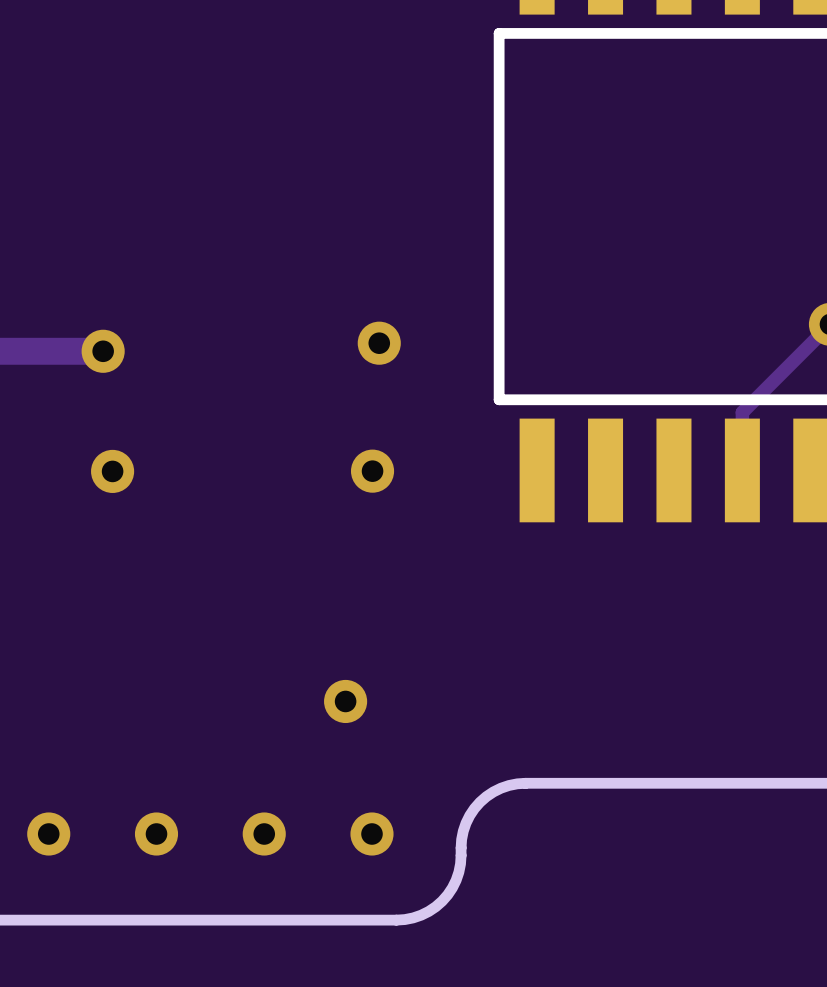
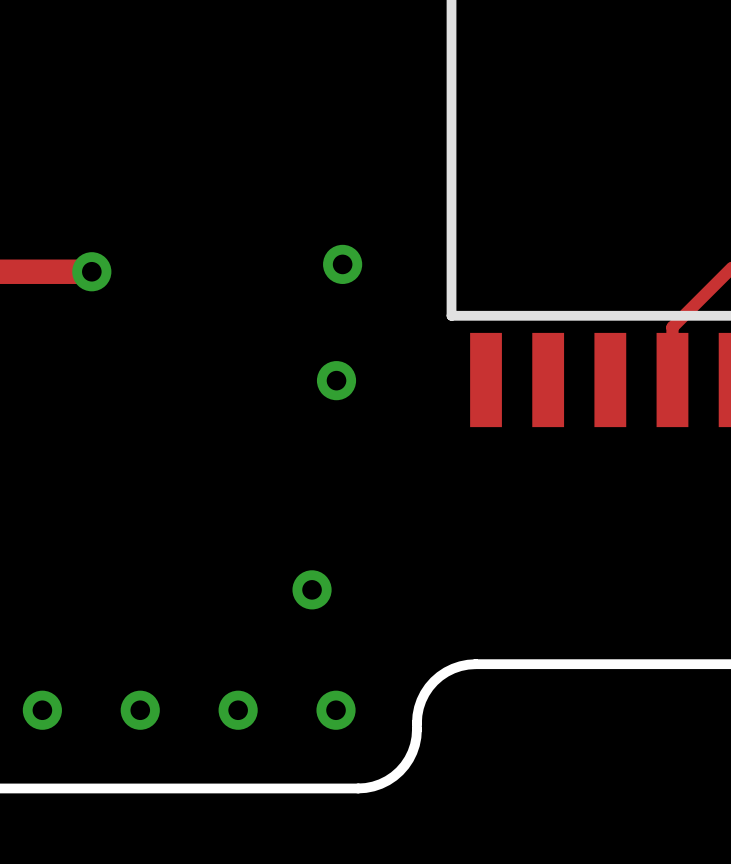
via: (112, 471) -> none

